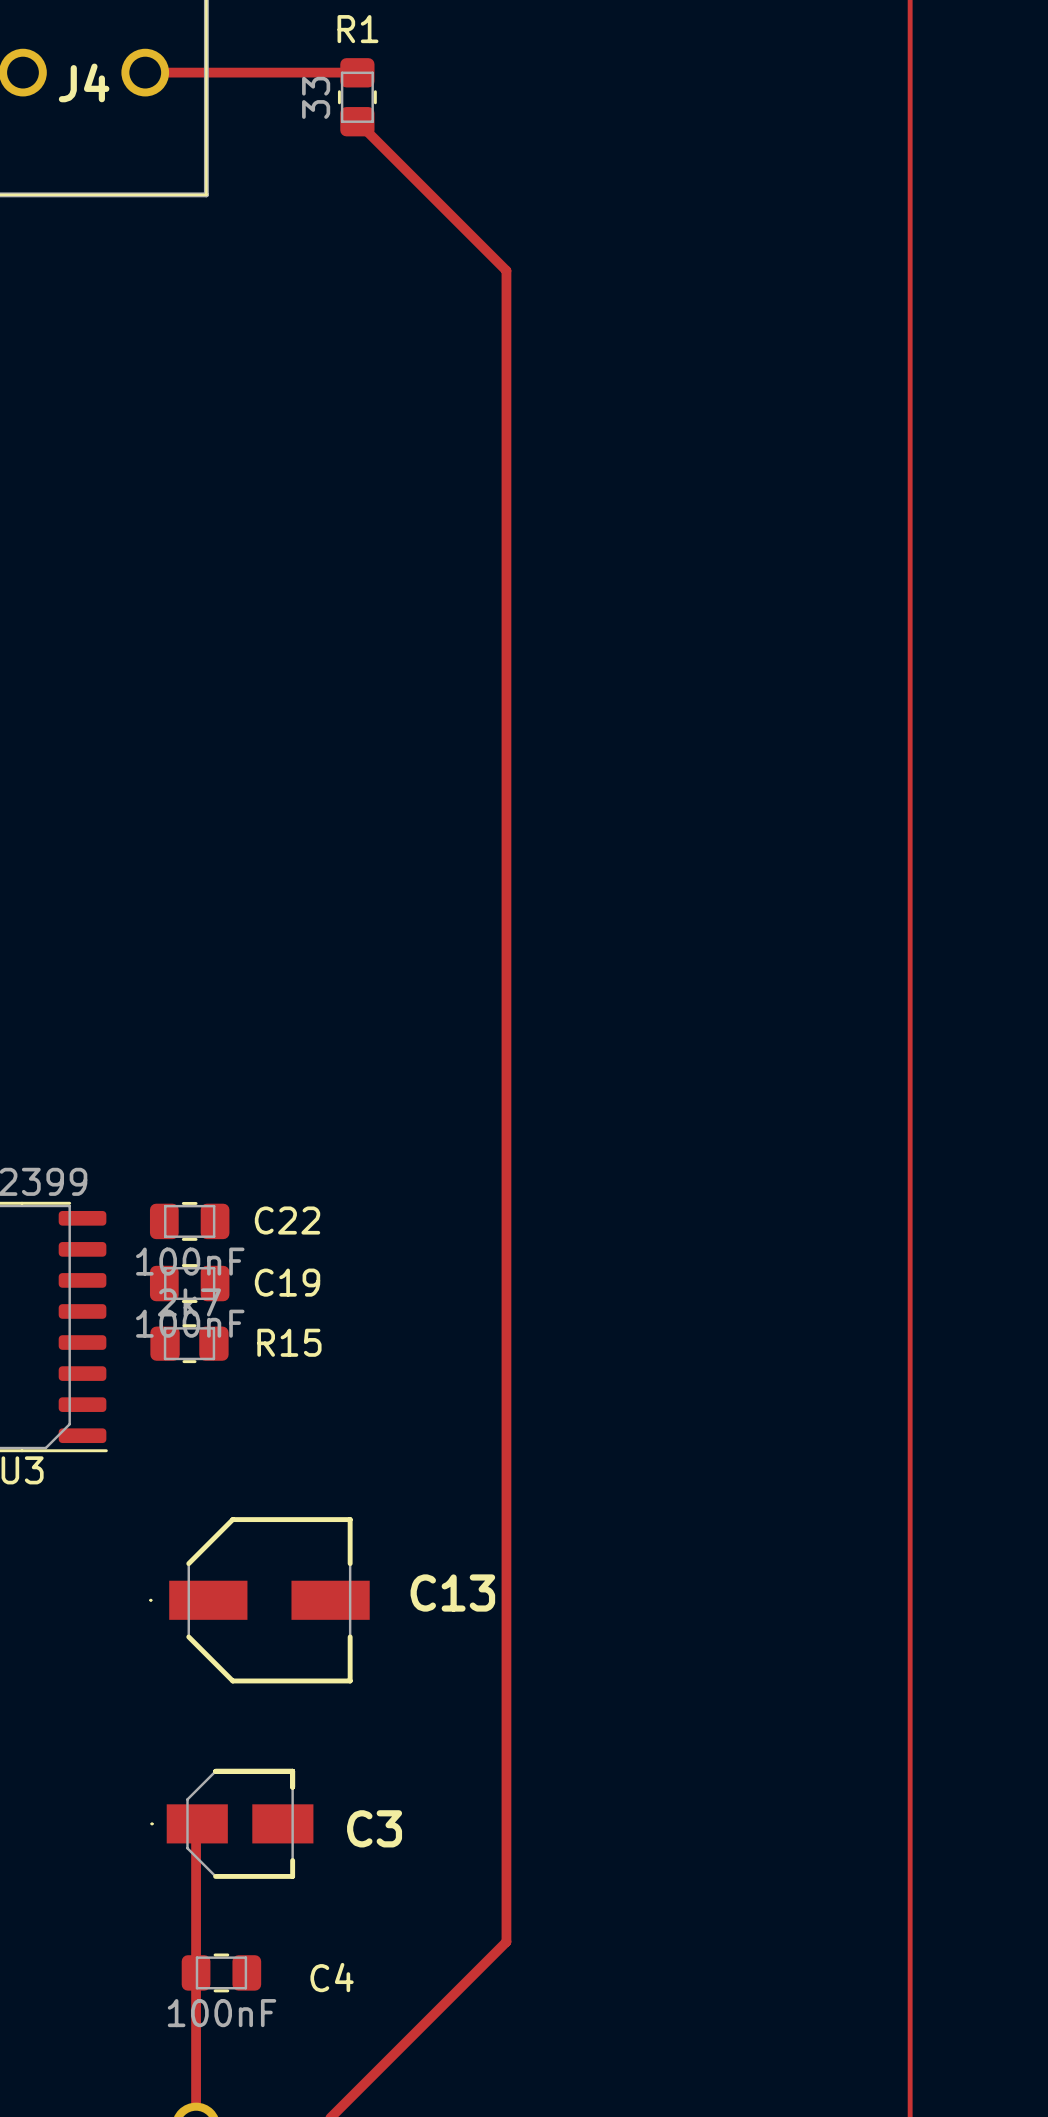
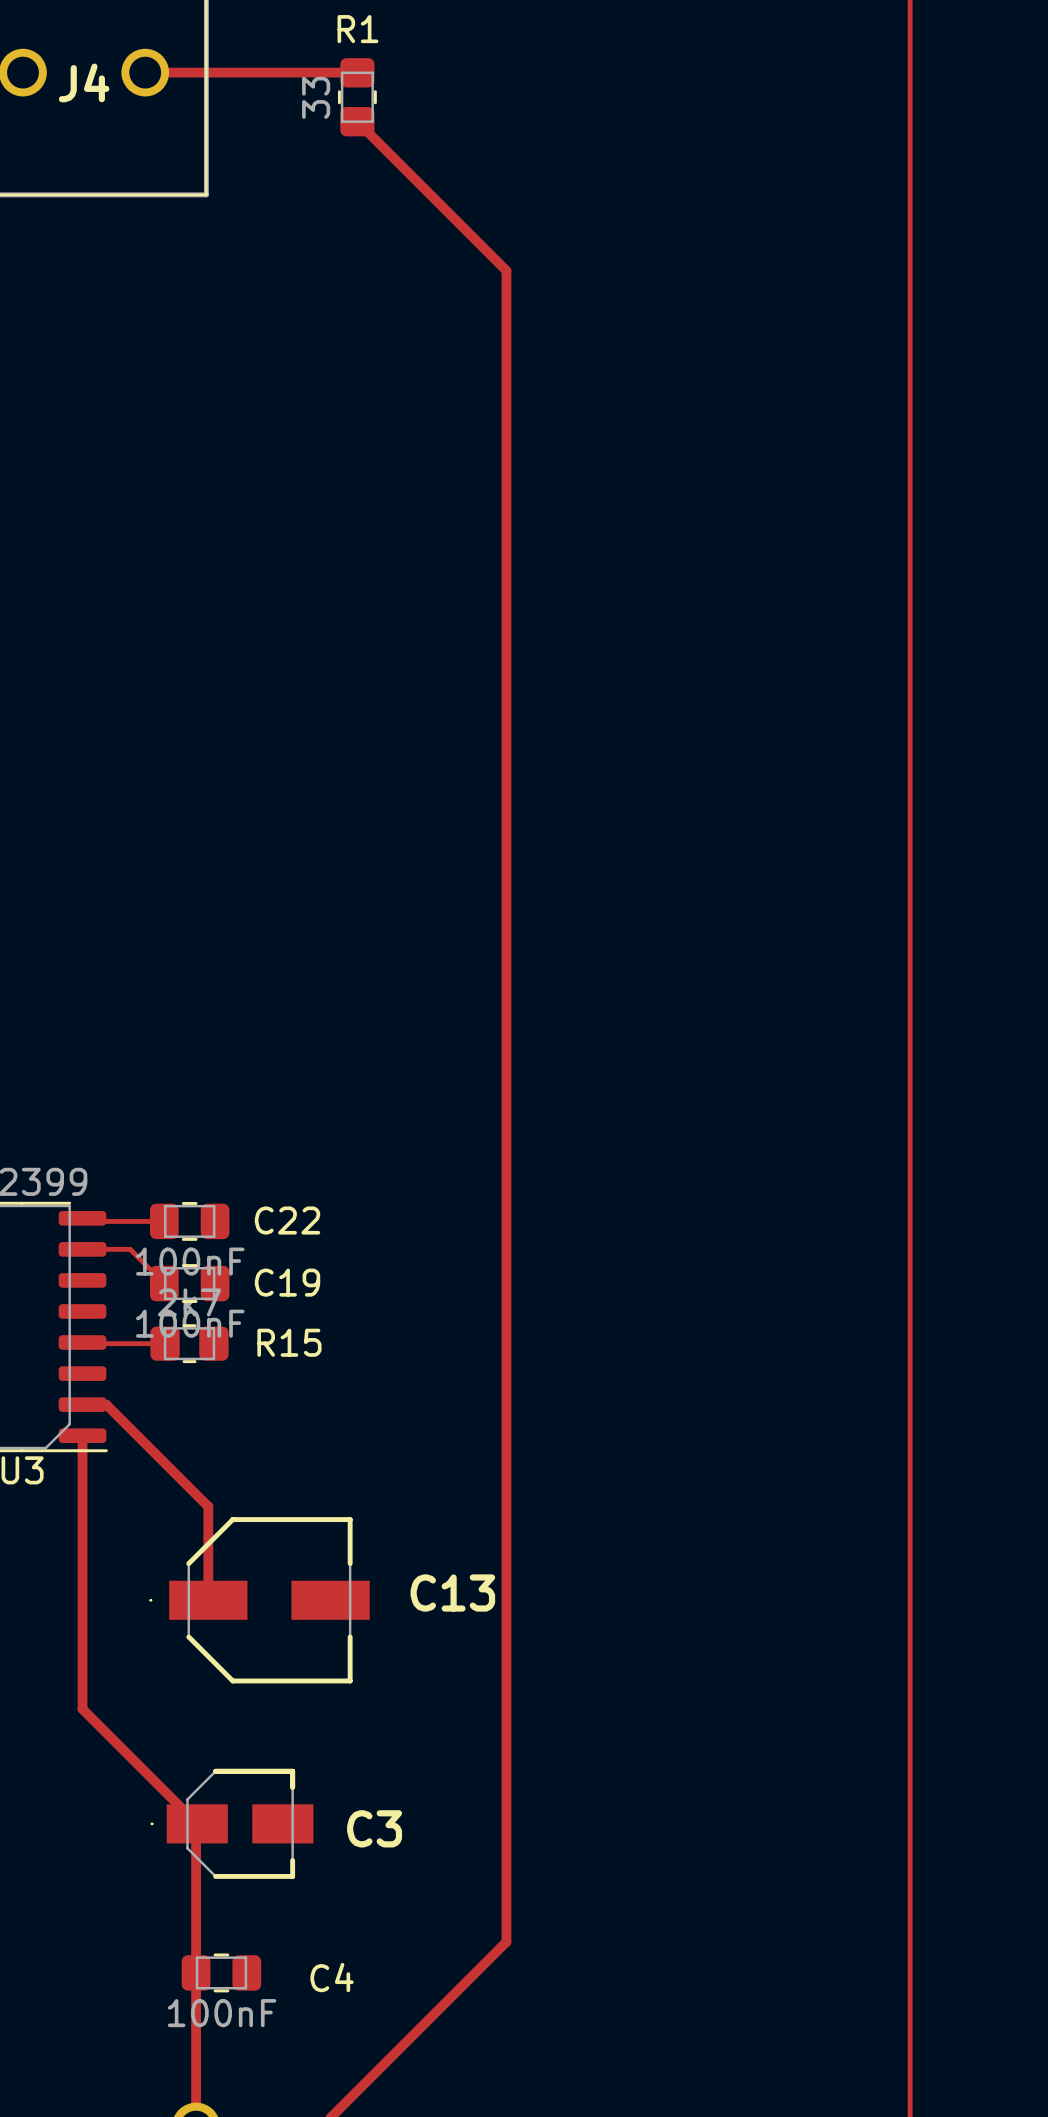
top track: none -> (82, 1218) (85, 1221) (164, 1221)
top track: none -> (82, 1249) (130, 1249) (164, 1283)
top track: none -> (82, 1342) (165, 1343)
top track: none -> (82, 1404) (106, 1404) (208, 1506) (208, 1600)
top track: none -> (82, 1435) (82, 1709) (197, 1823)

